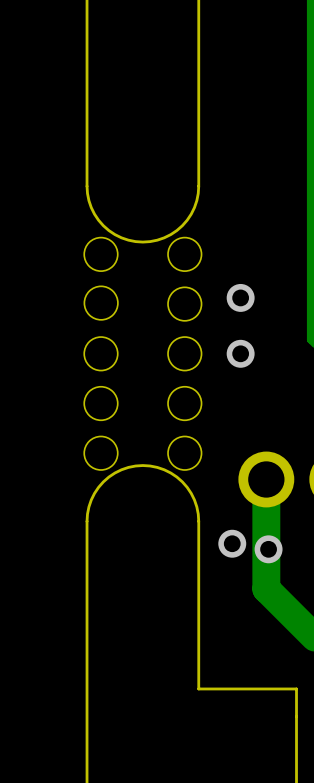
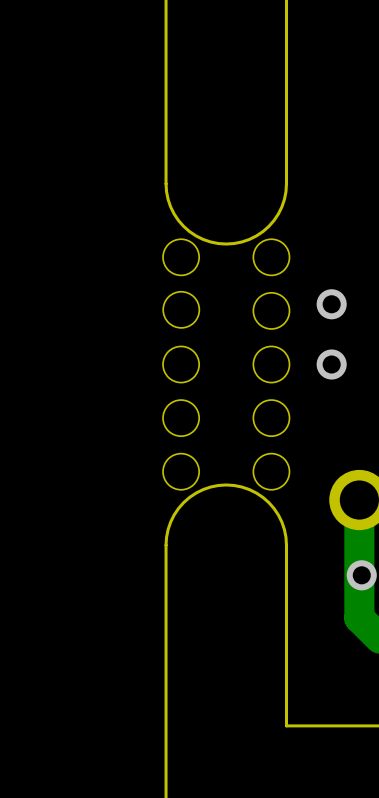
via: (232, 543) -> none

